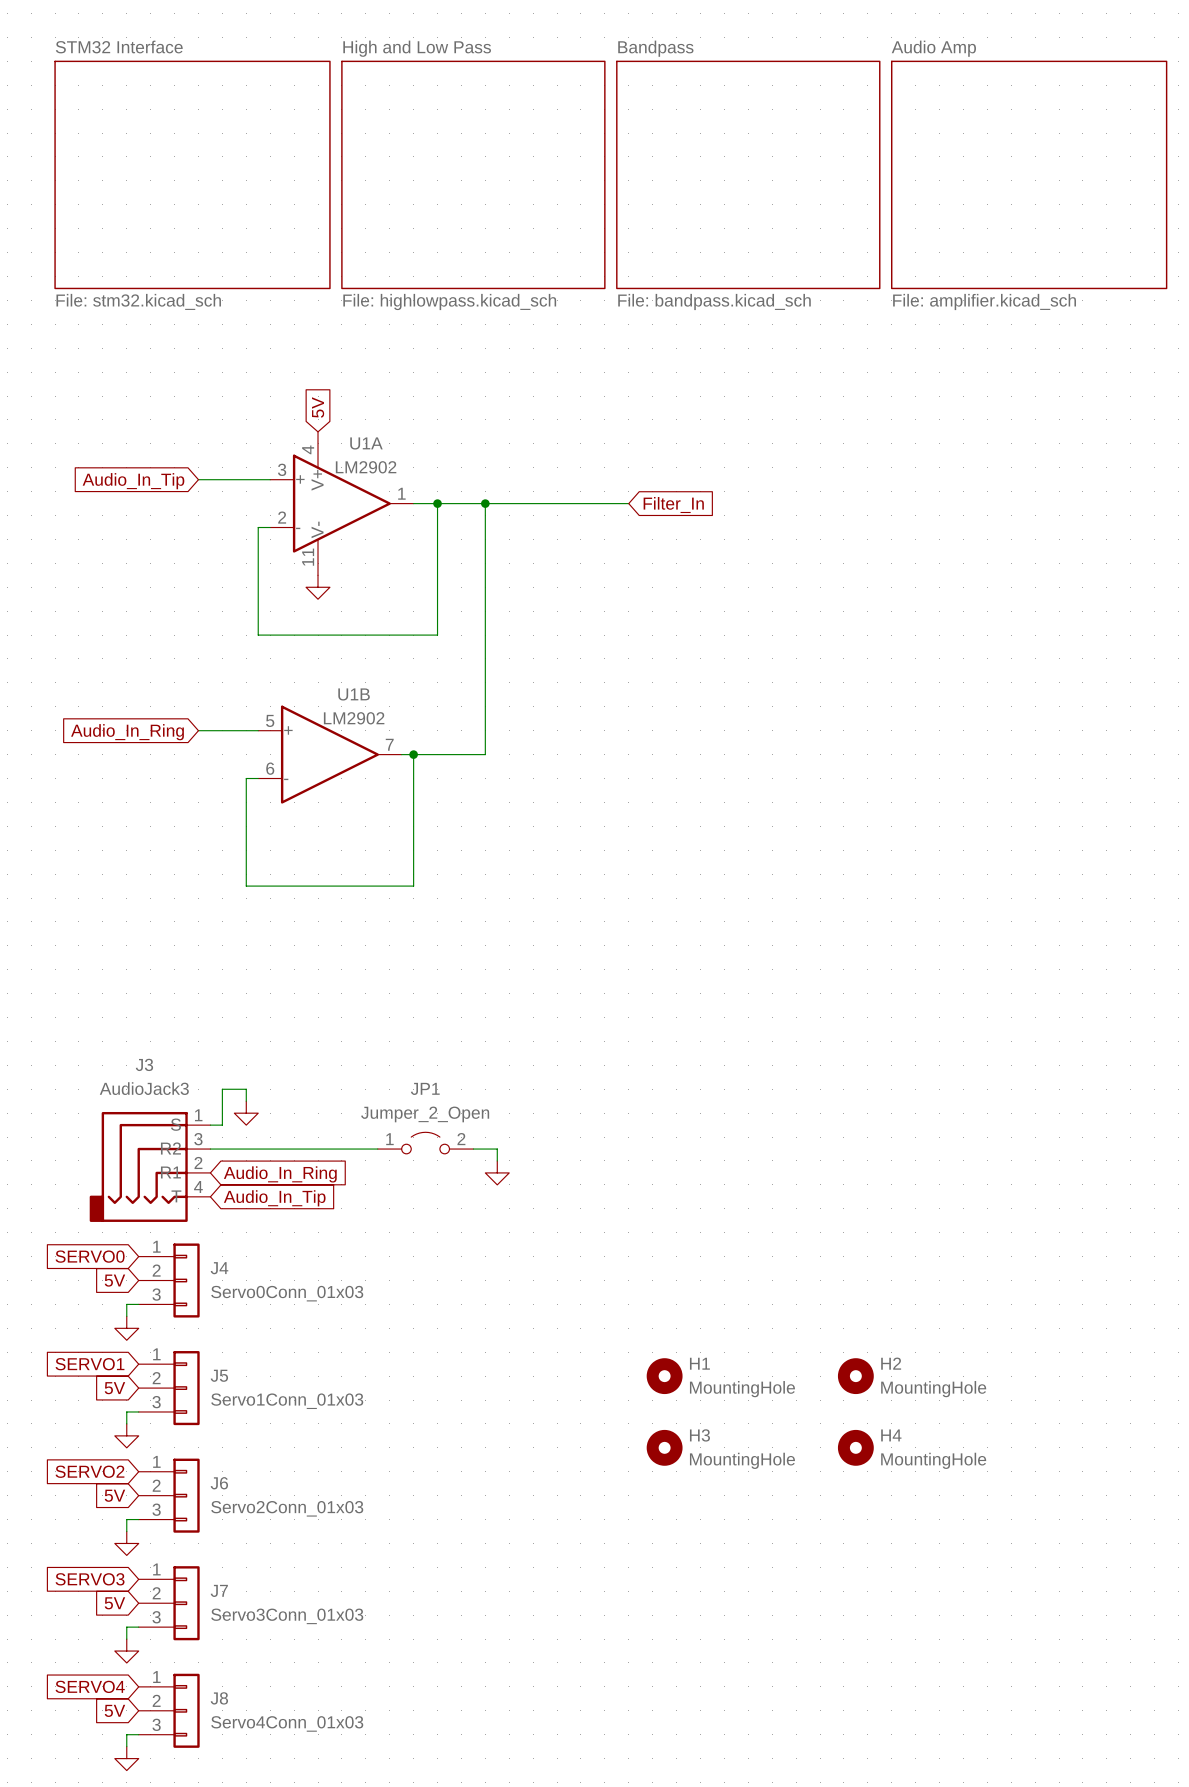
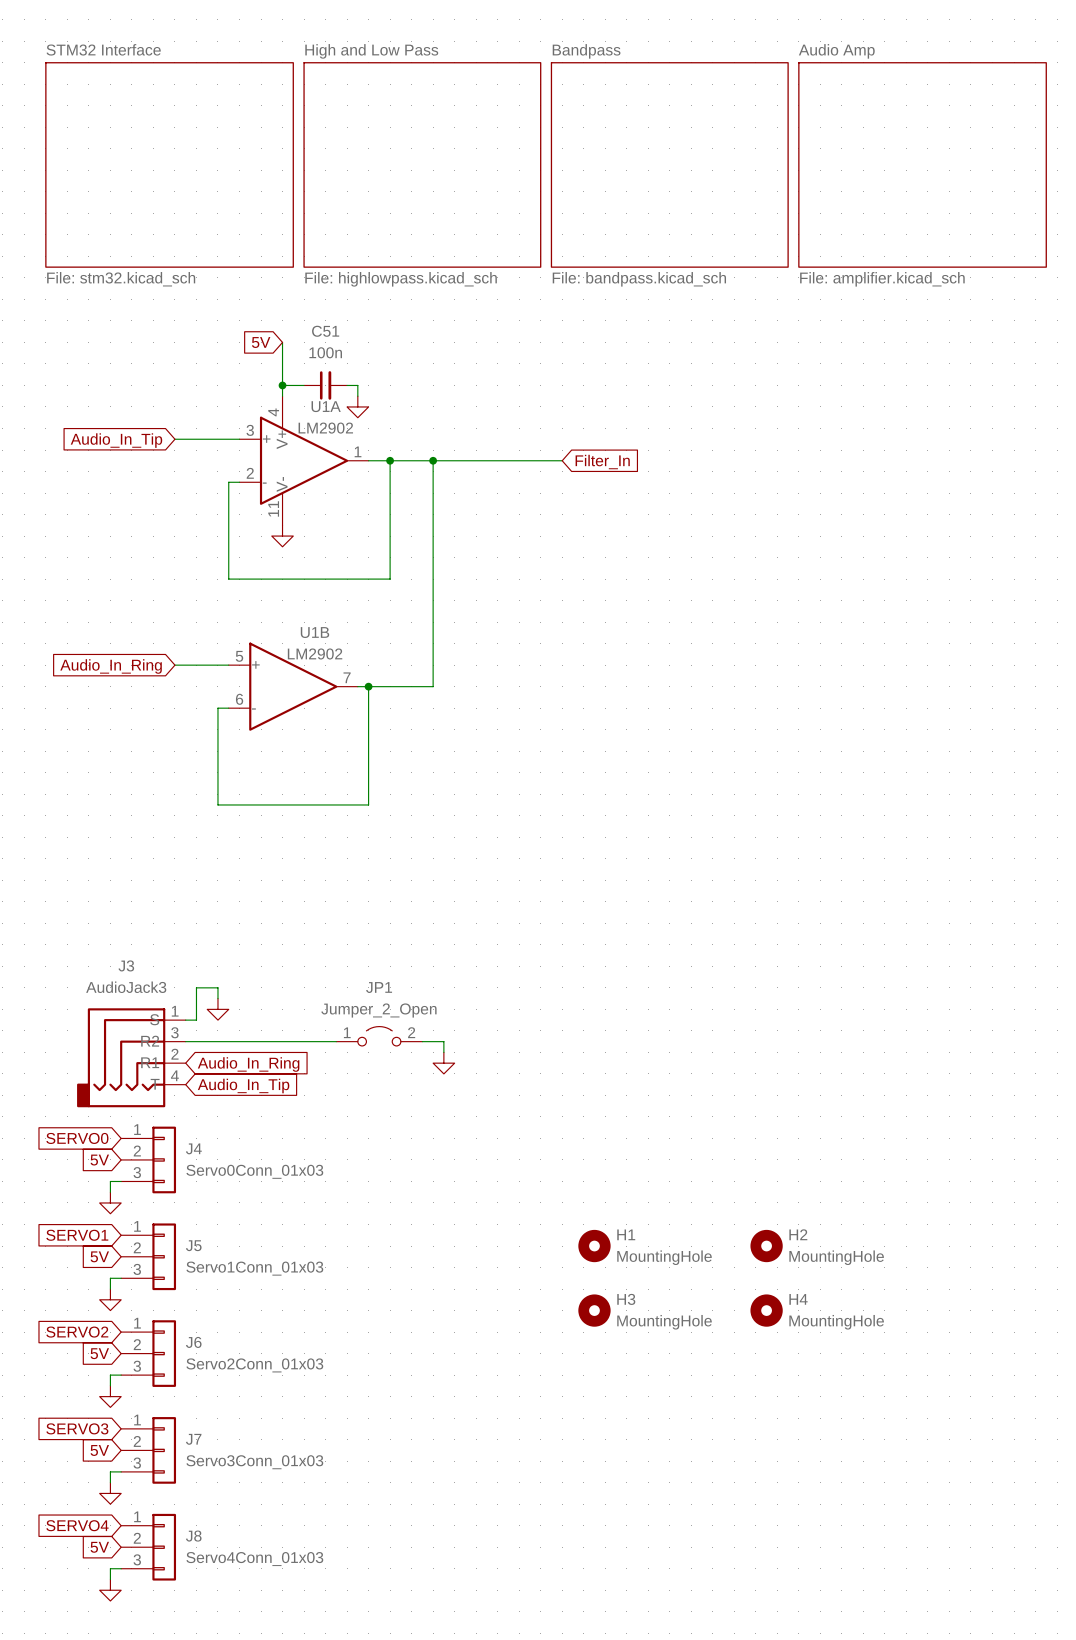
wire: none -> (282, 342) (282, 396)
global label rotation: 0° (318, 407) -> 90° counterclockwise (261, 342)
wire: none -> (282, 385) (304, 385)
junction: none -> (282, 385)
C51: none -> 100n (325, 385)
wire: none -> (347, 385) (357, 385) (357, 396)
power symbol: none -> (357, 406)

